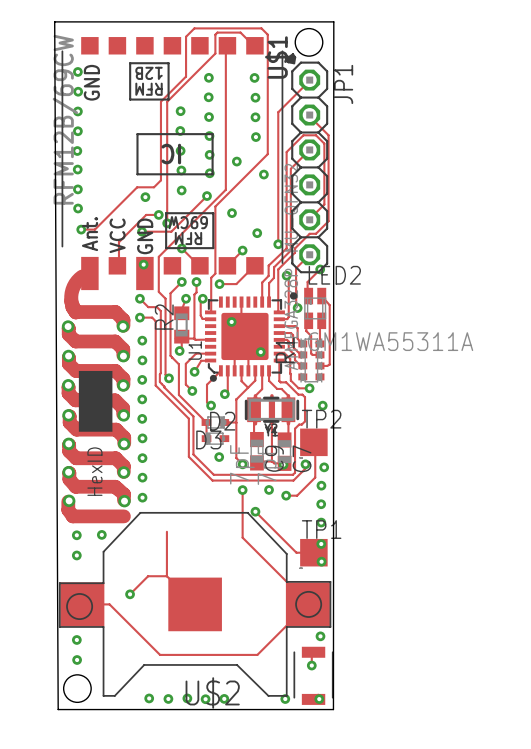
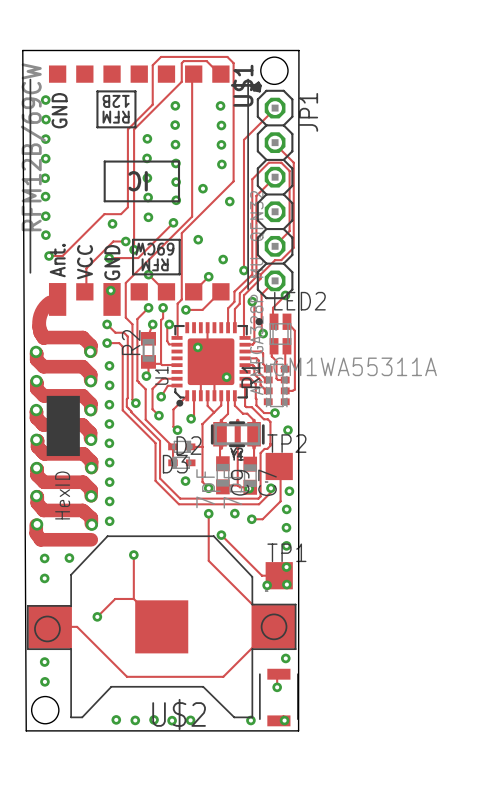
via: none -> (133, 555)
via: none -> (267, 585)

